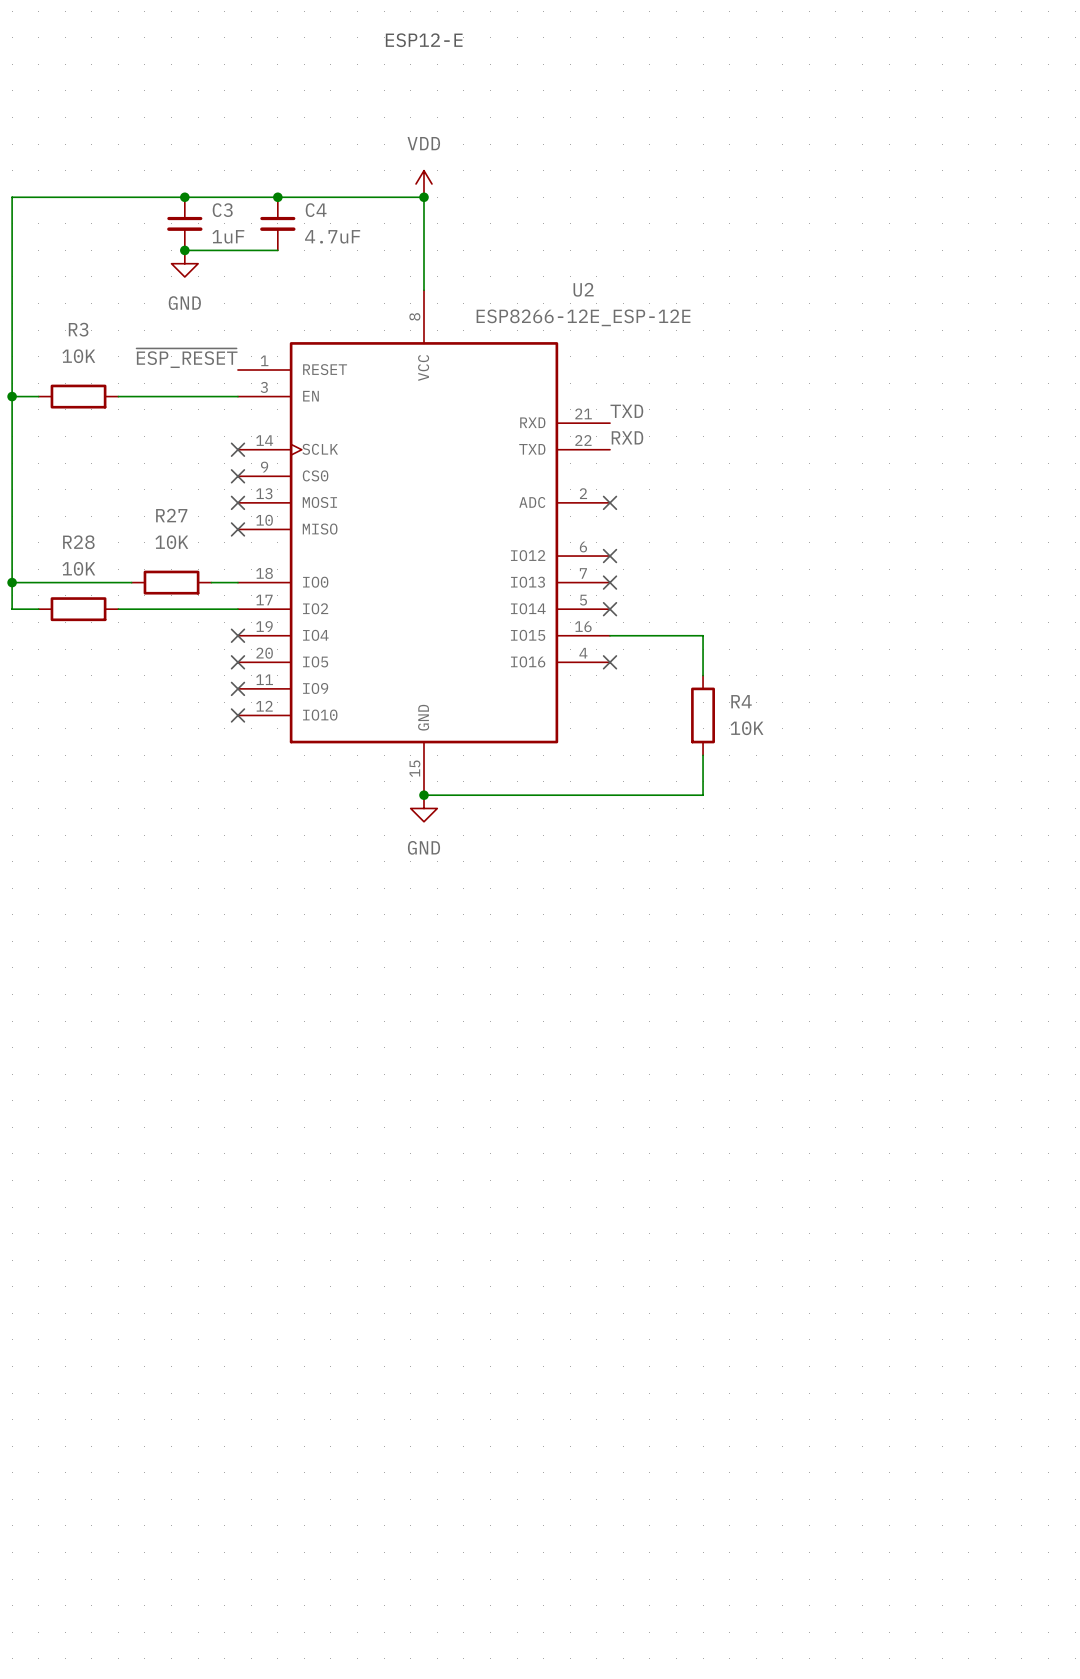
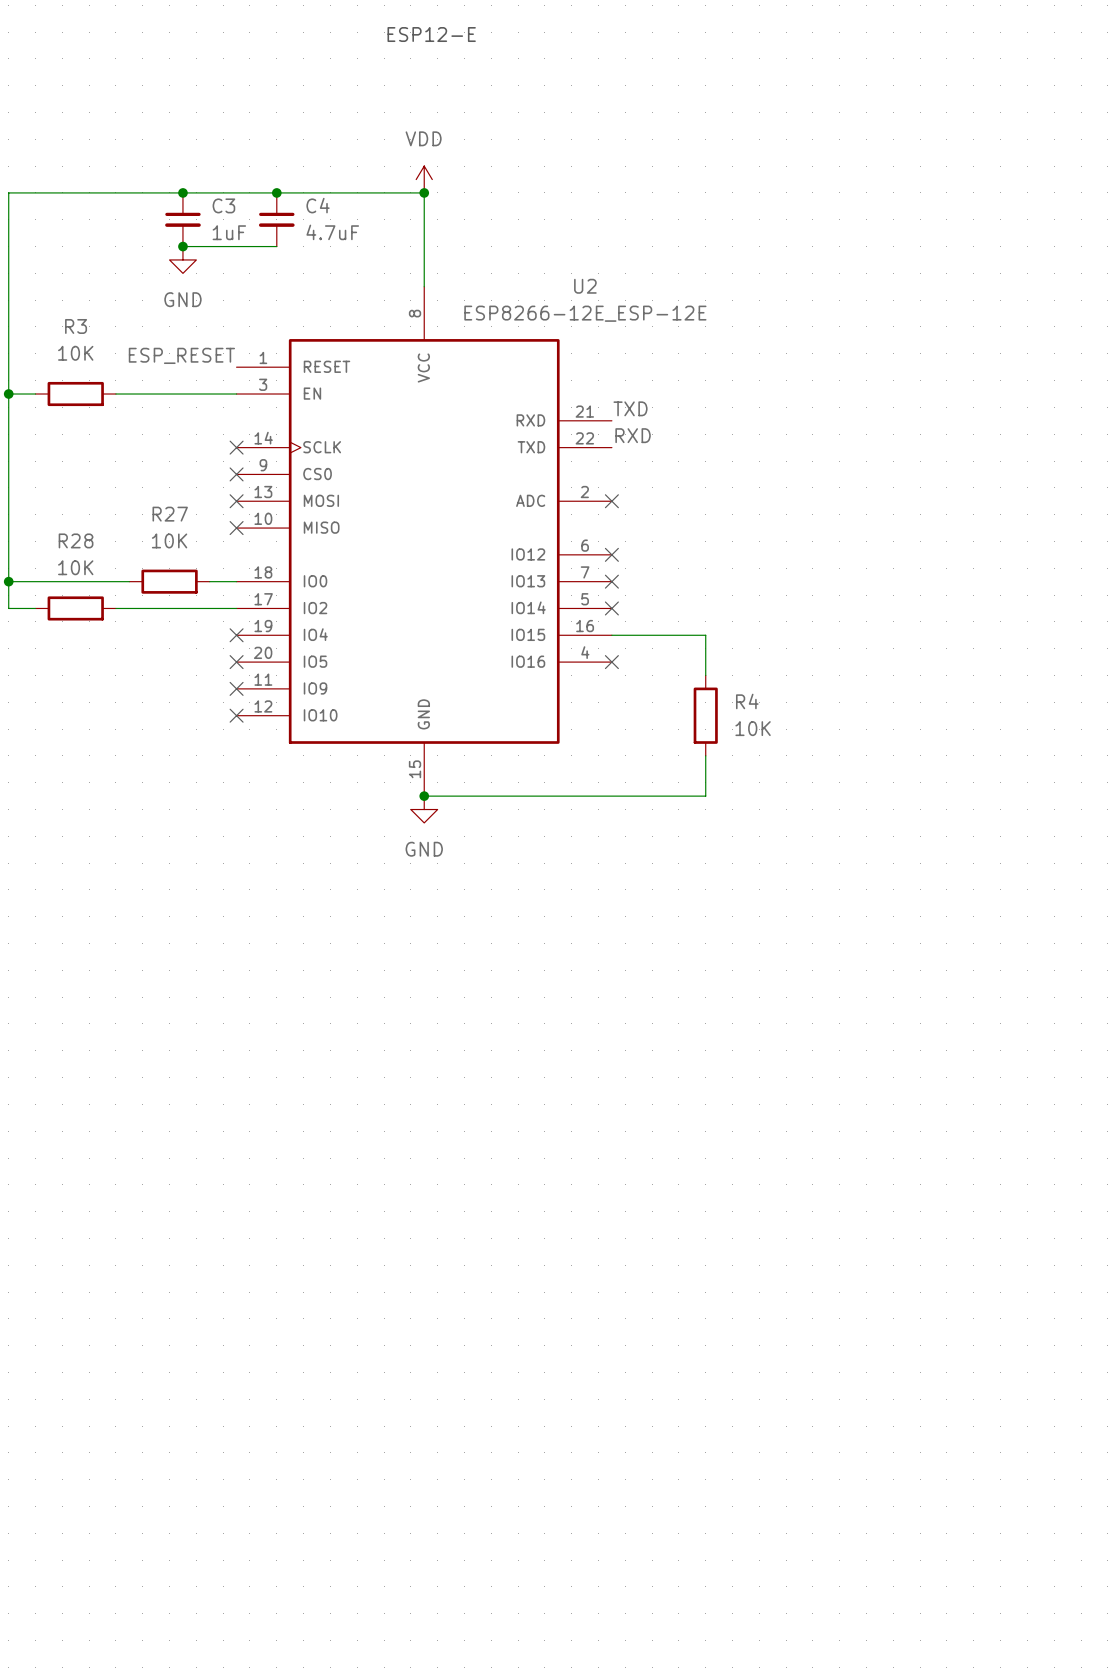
label: ~{ESP_RESET} (187, 358) -> ESP_RESET (181, 355)

